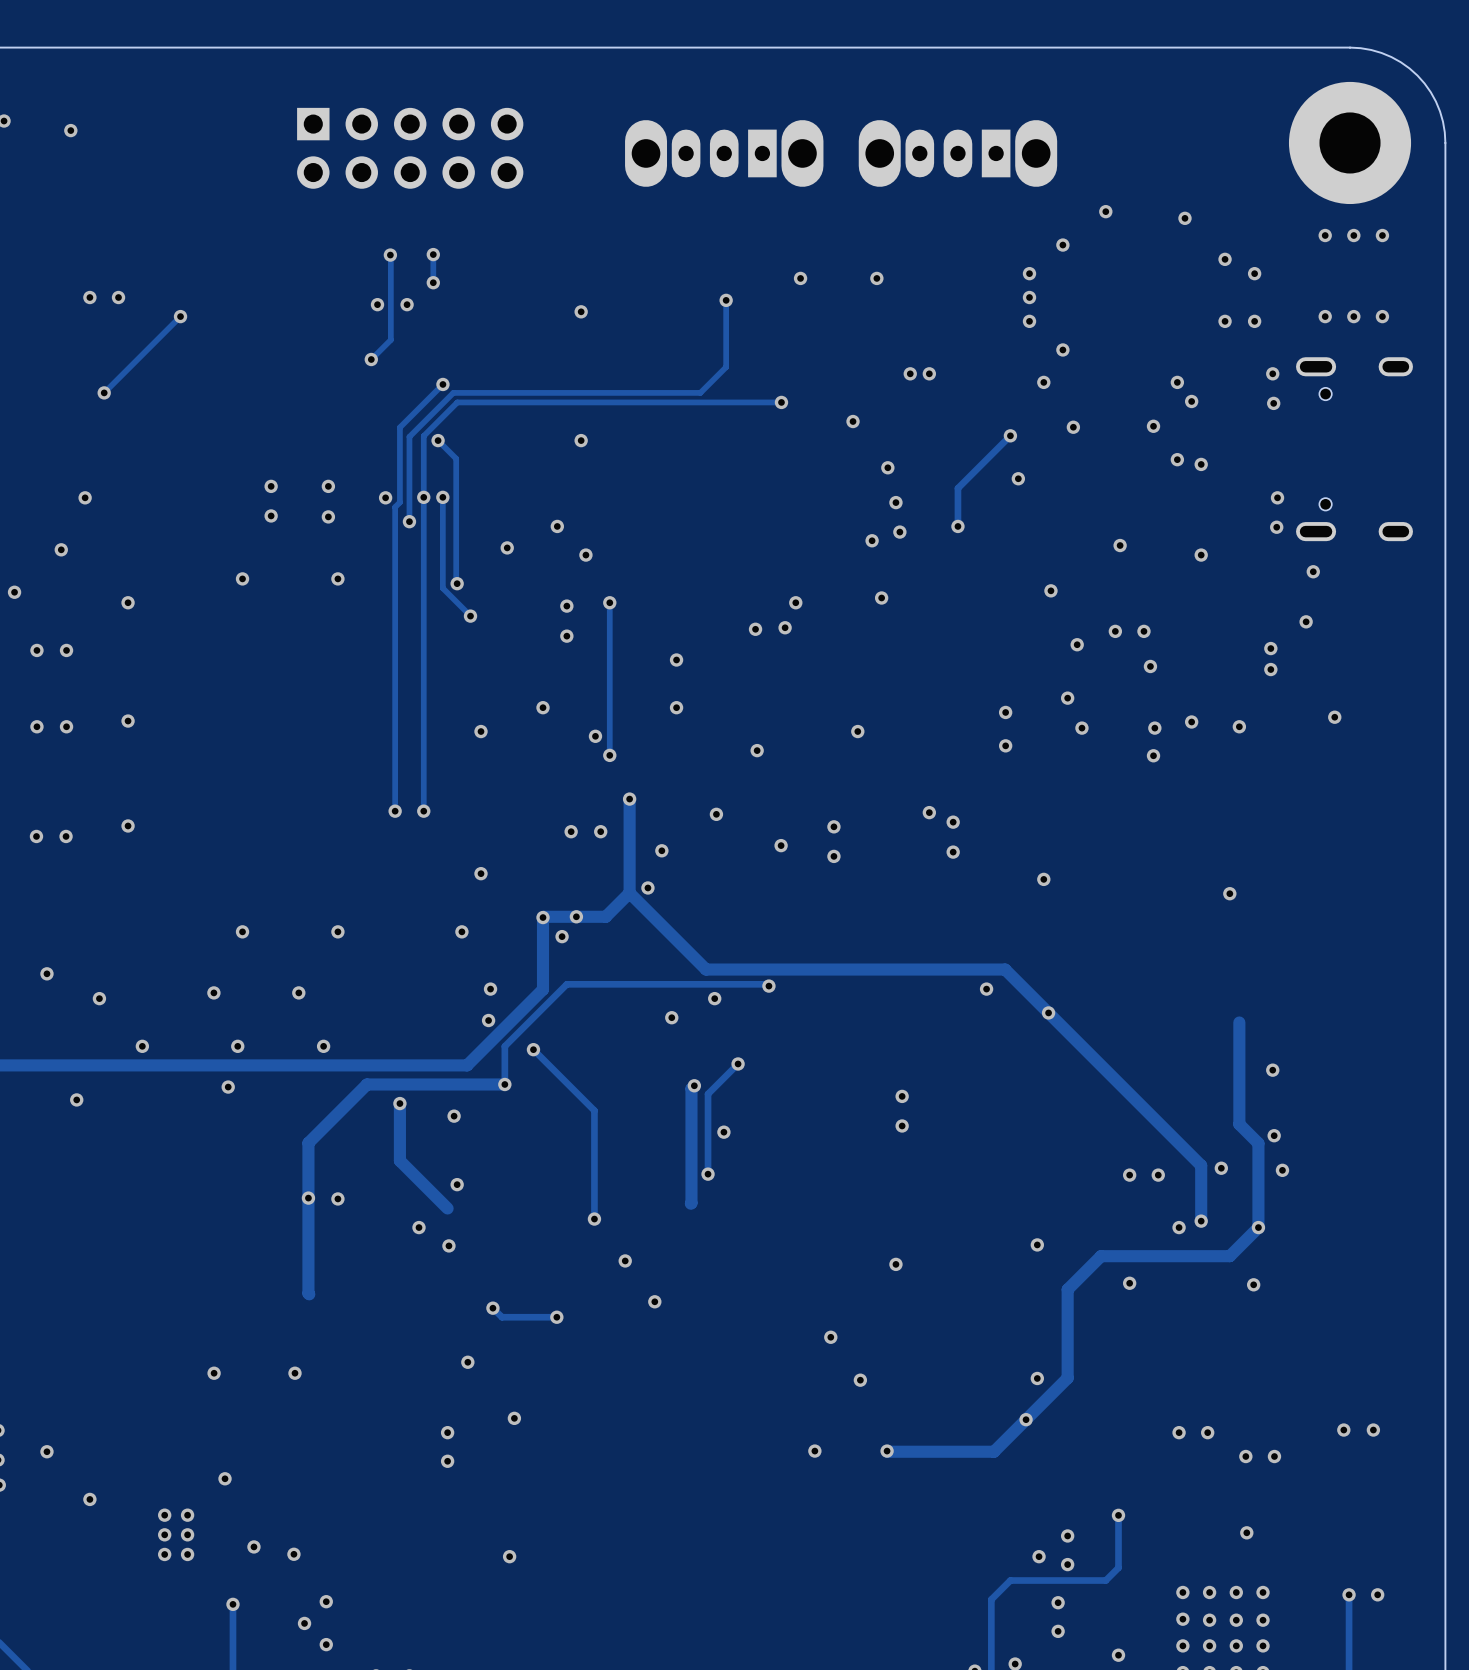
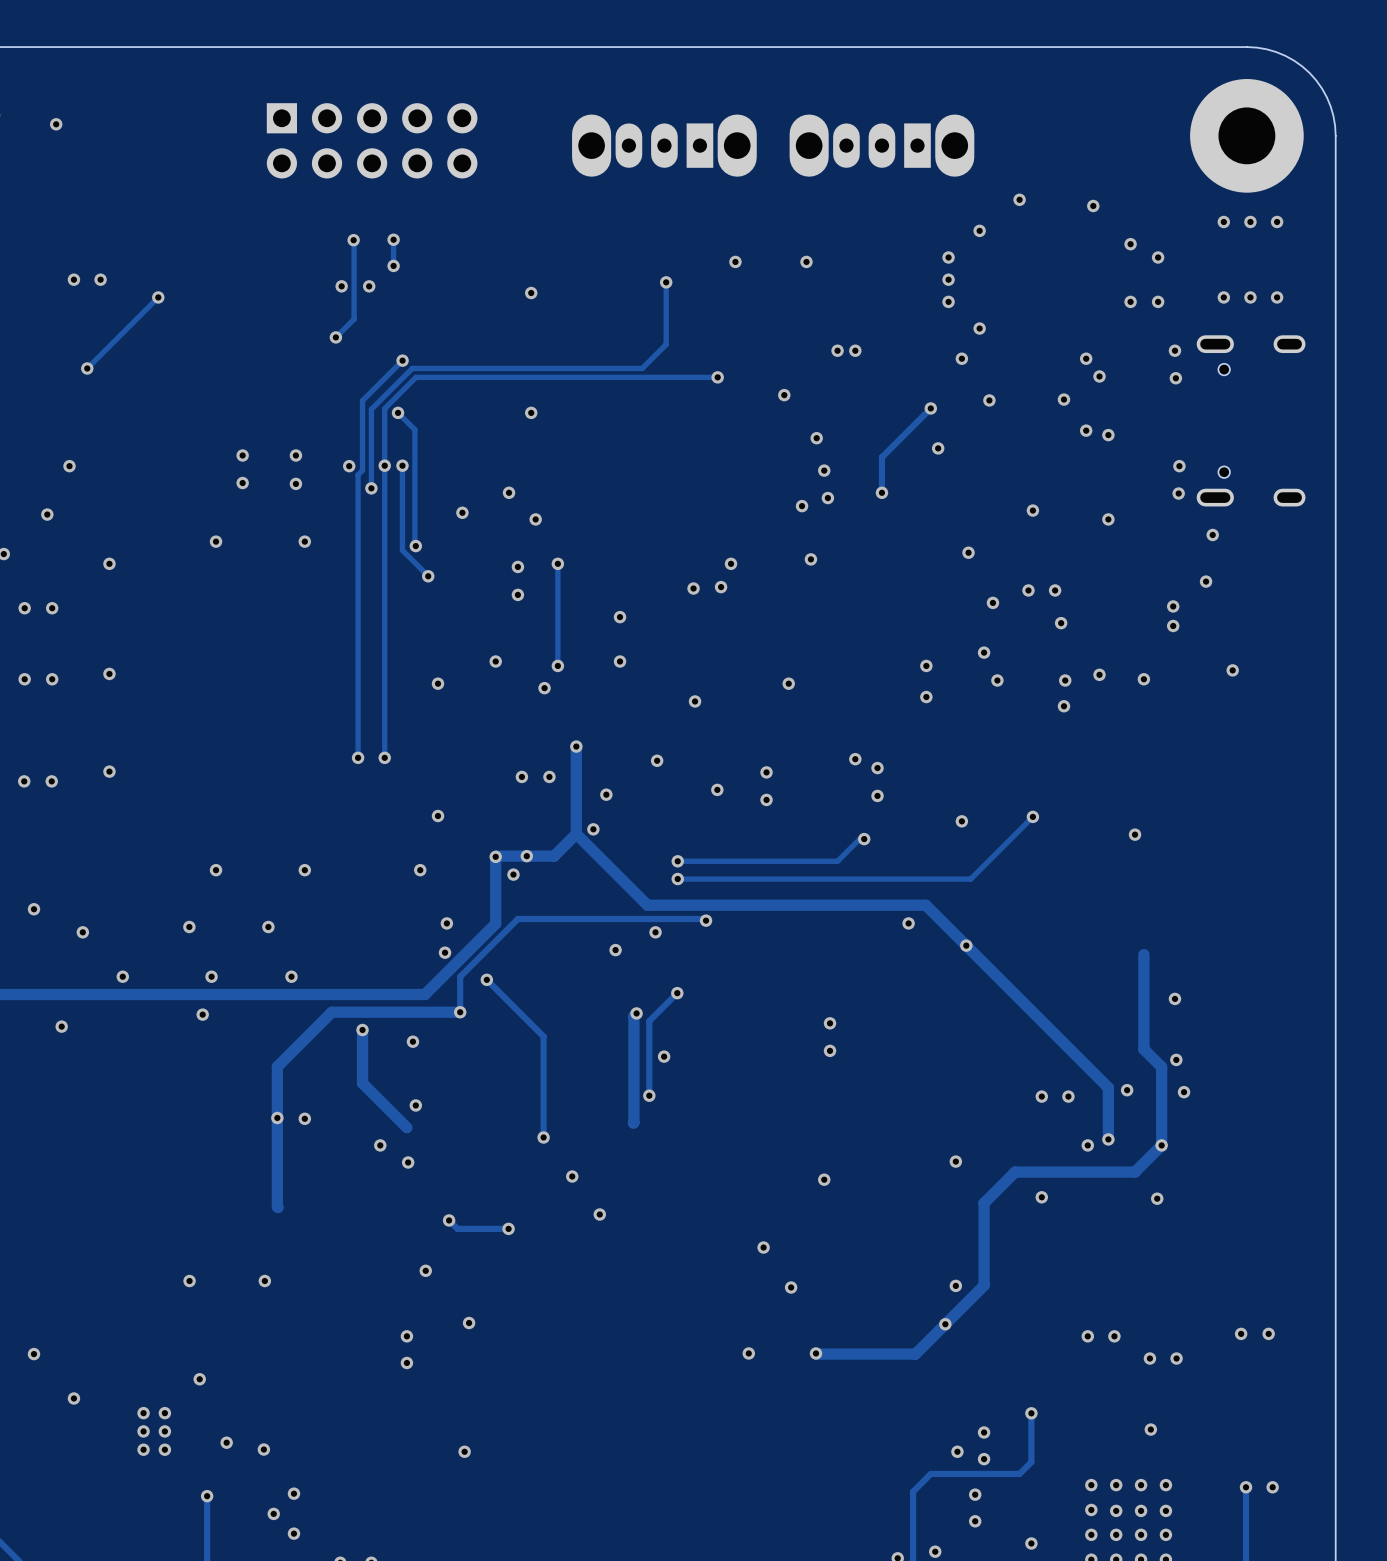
track: (609, 712) (609, 755) -> none
via position: (609, 755) -> (557, 665)
track: none -> (1032, 816) (970, 879) (677, 879)
via: none -> (1032, 816)
track: none -> (864, 839) (859, 839) (837, 861) (677, 861)
via: none -> (864, 839)
via: none -> (677, 861)
via: none -> (677, 879)

